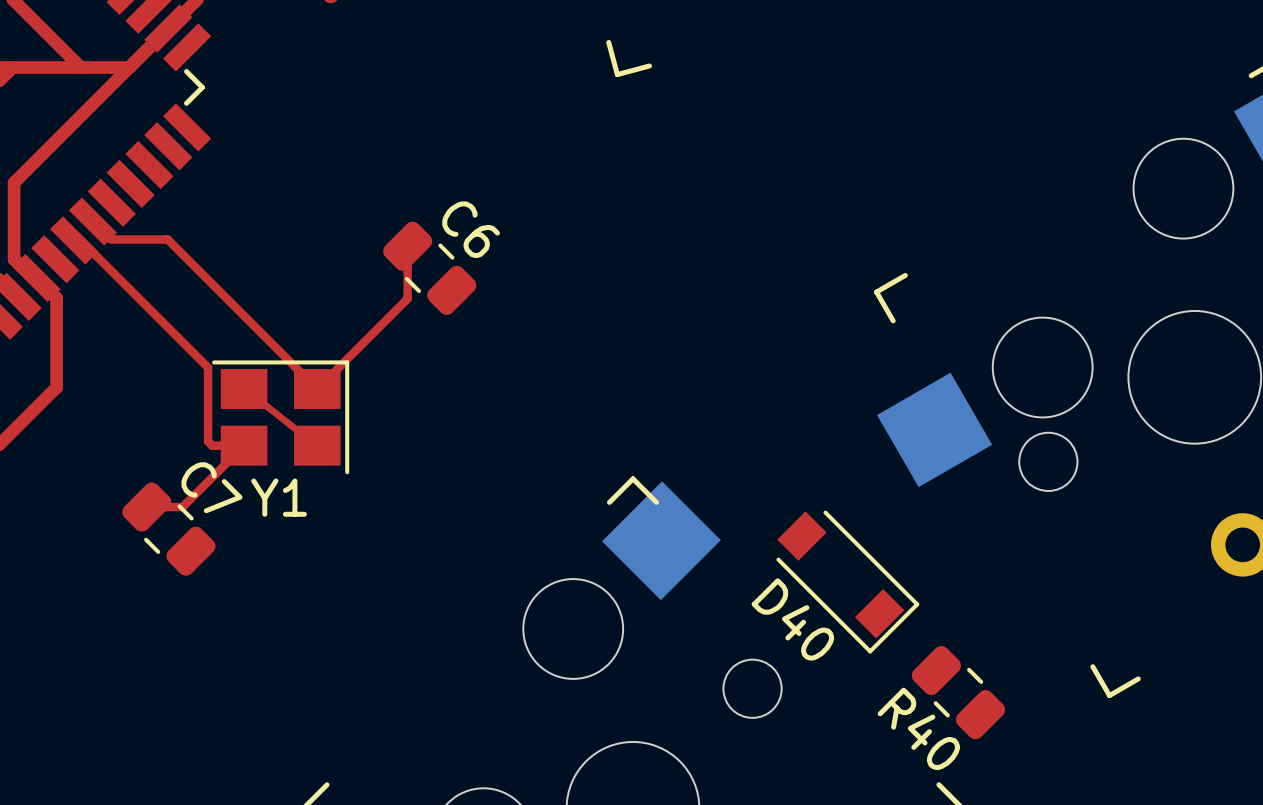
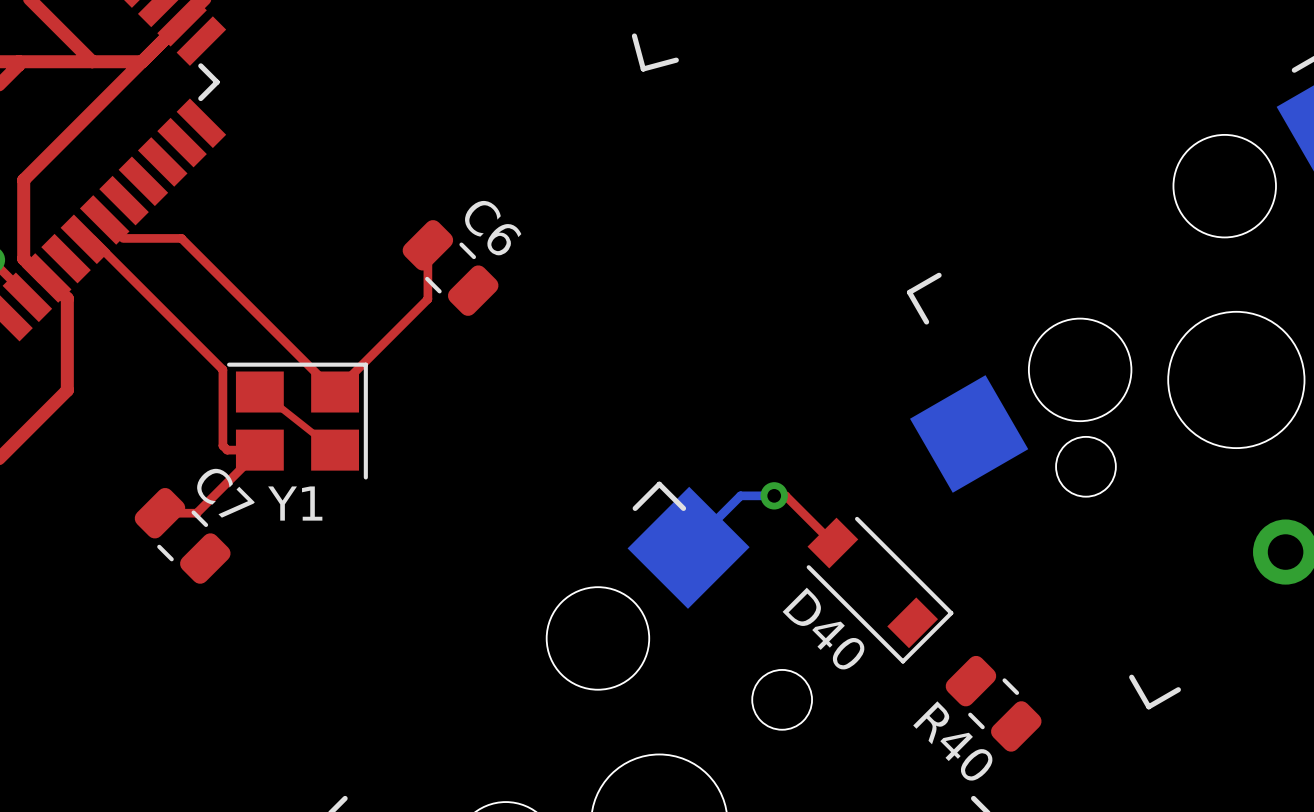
top track: none -> (774, 495) (785, 495) (832, 543)
bottom track: none -> (774, 495) (740, 495) (688, 547)
via: none -> (774, 495)

